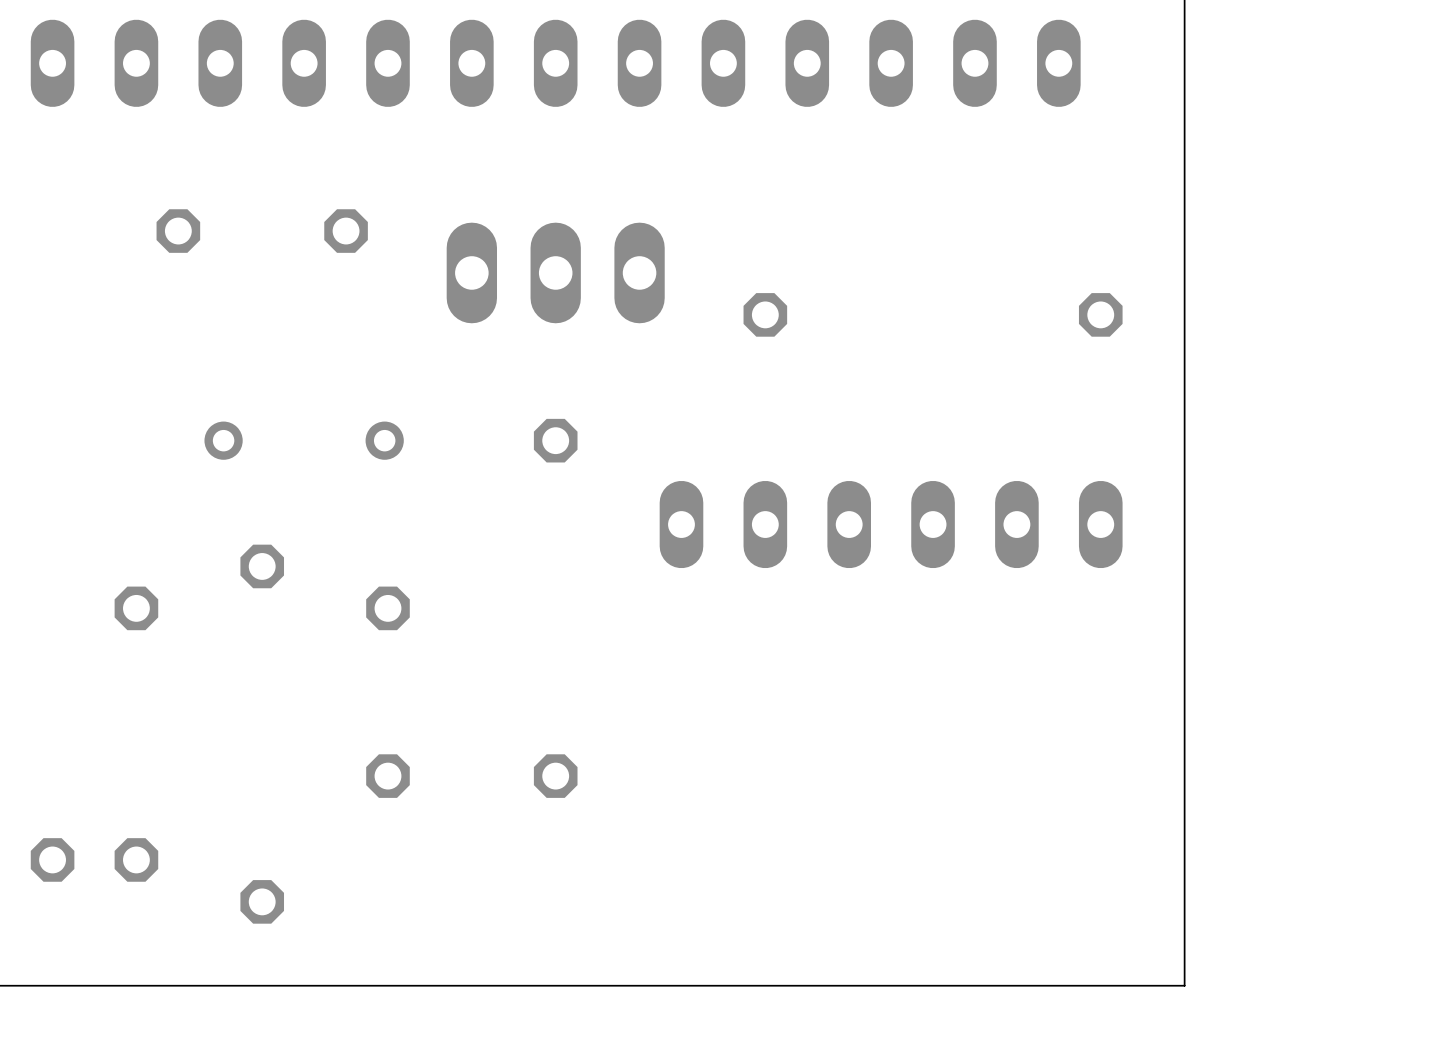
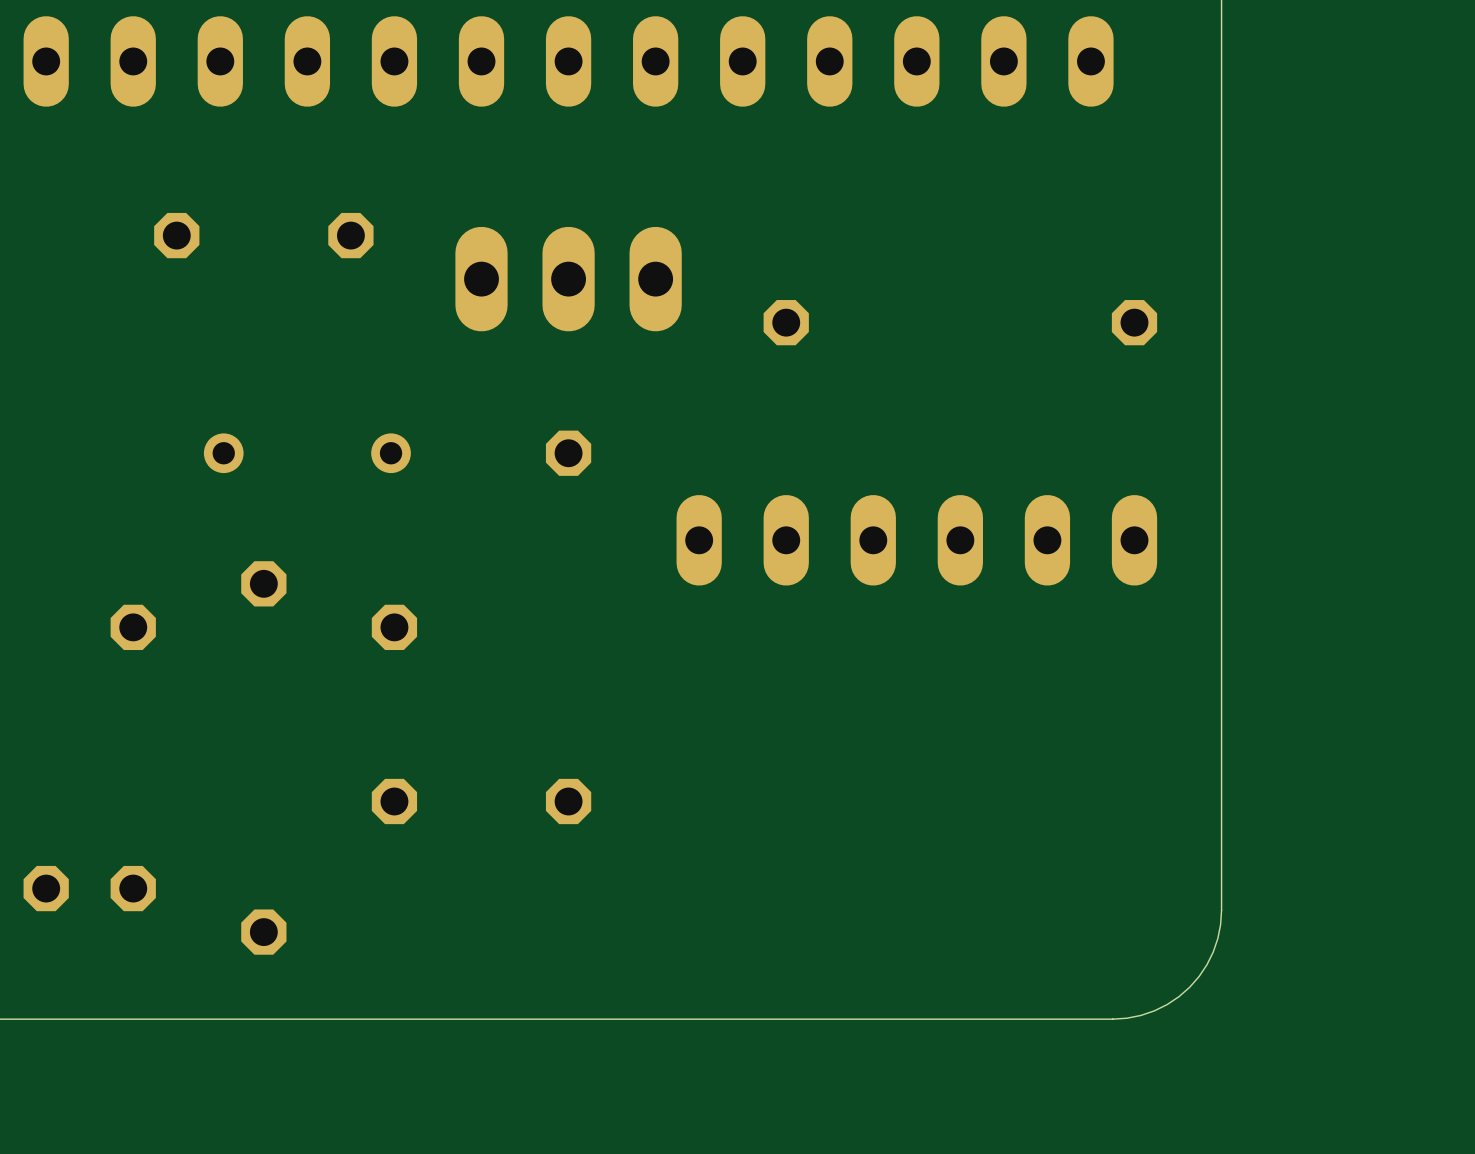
board edge: (1184, 880) (1184, 985) (1079, 985) -> (1221, 910) (1217, 938) (1213, 951) (1206, 964) (1189, 987) (1167, 1004) (1154, 1010) (1140, 1015) (1112, 1019)

